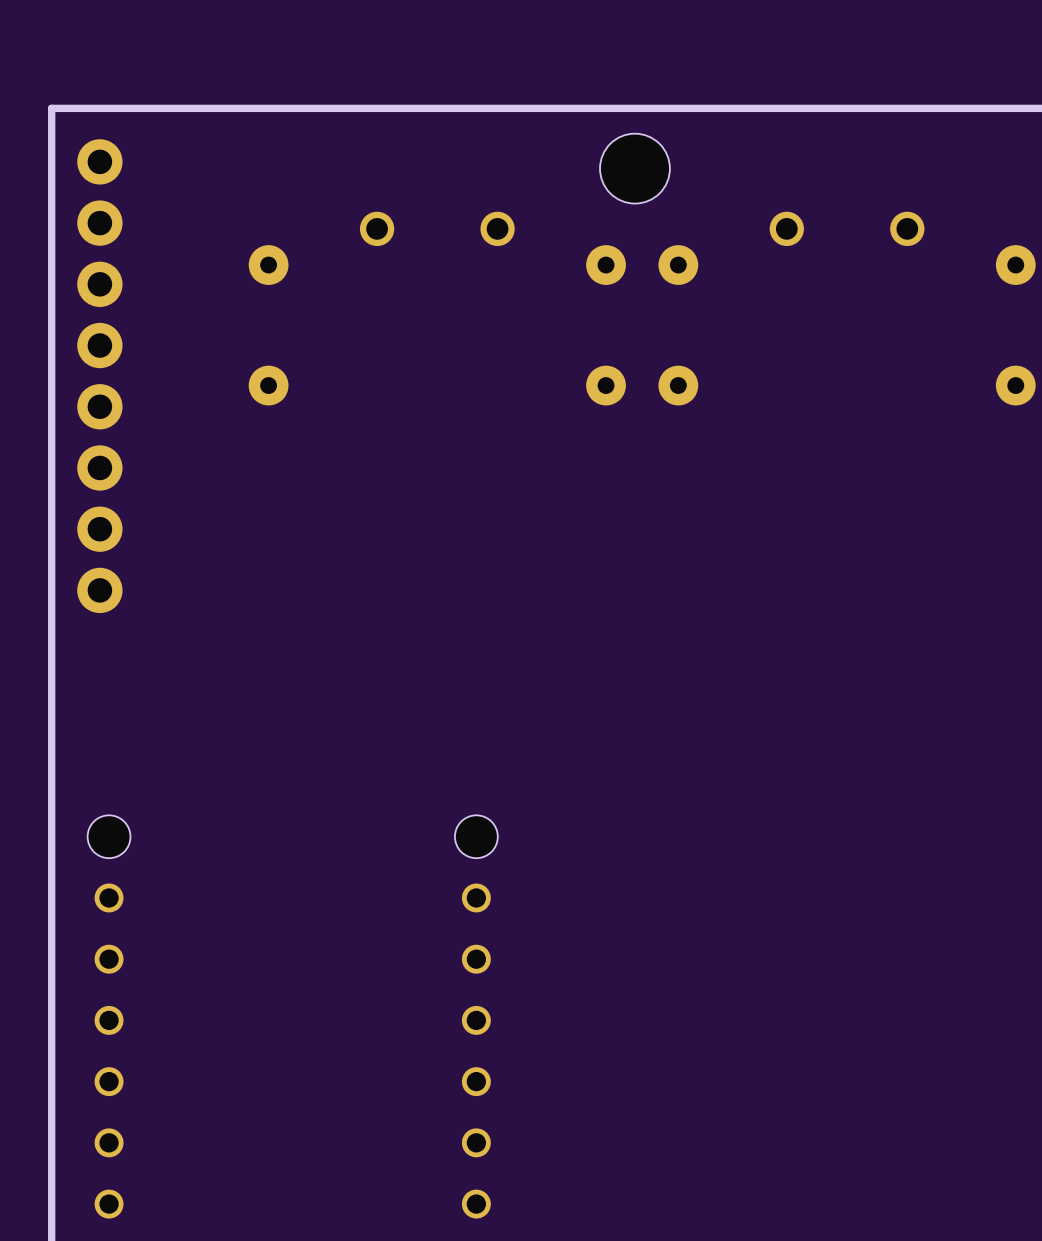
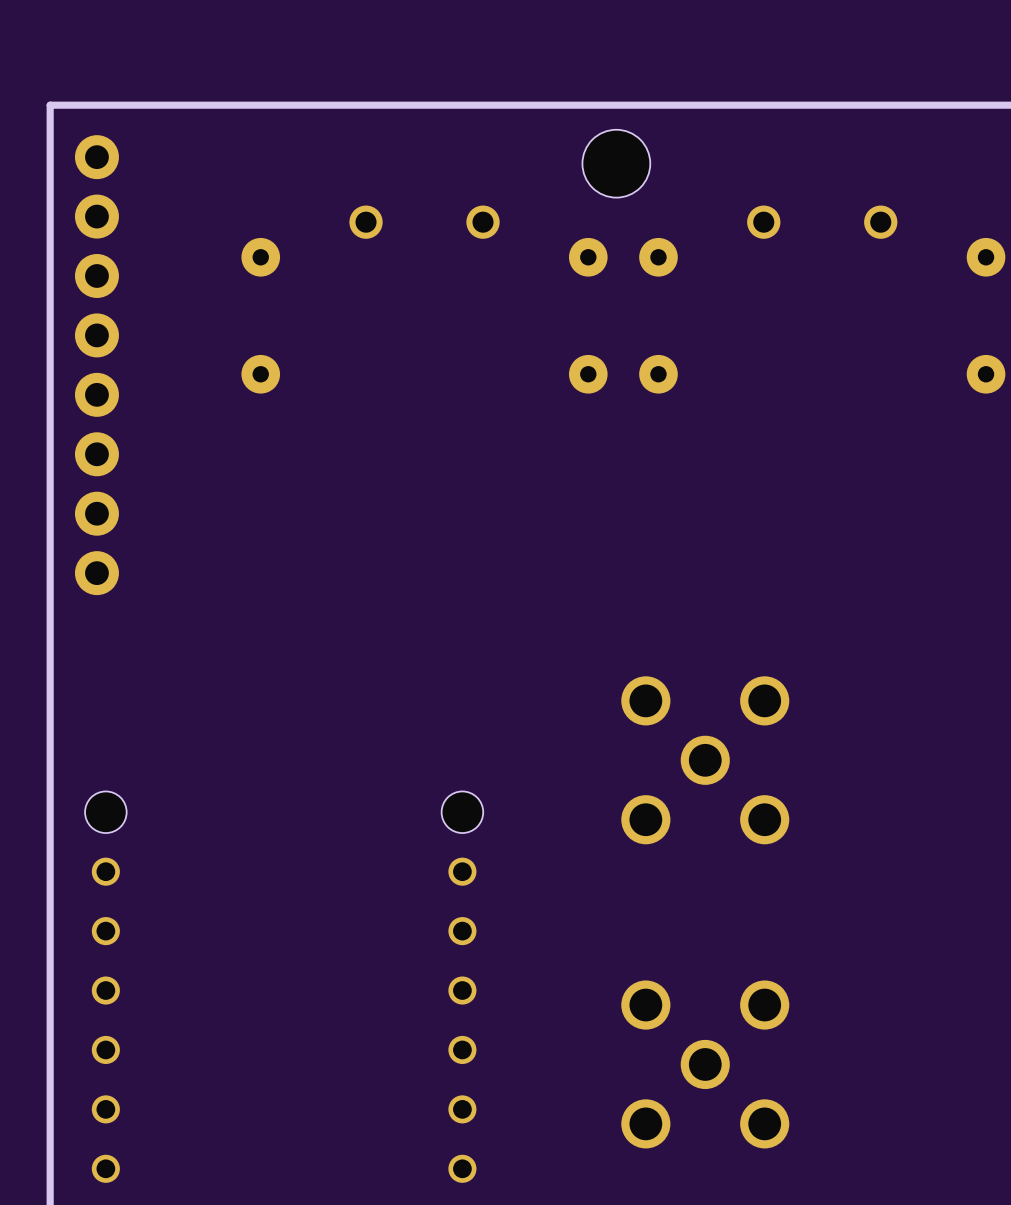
part: none -> (705, 760)
part: none -> (705, 1064)

